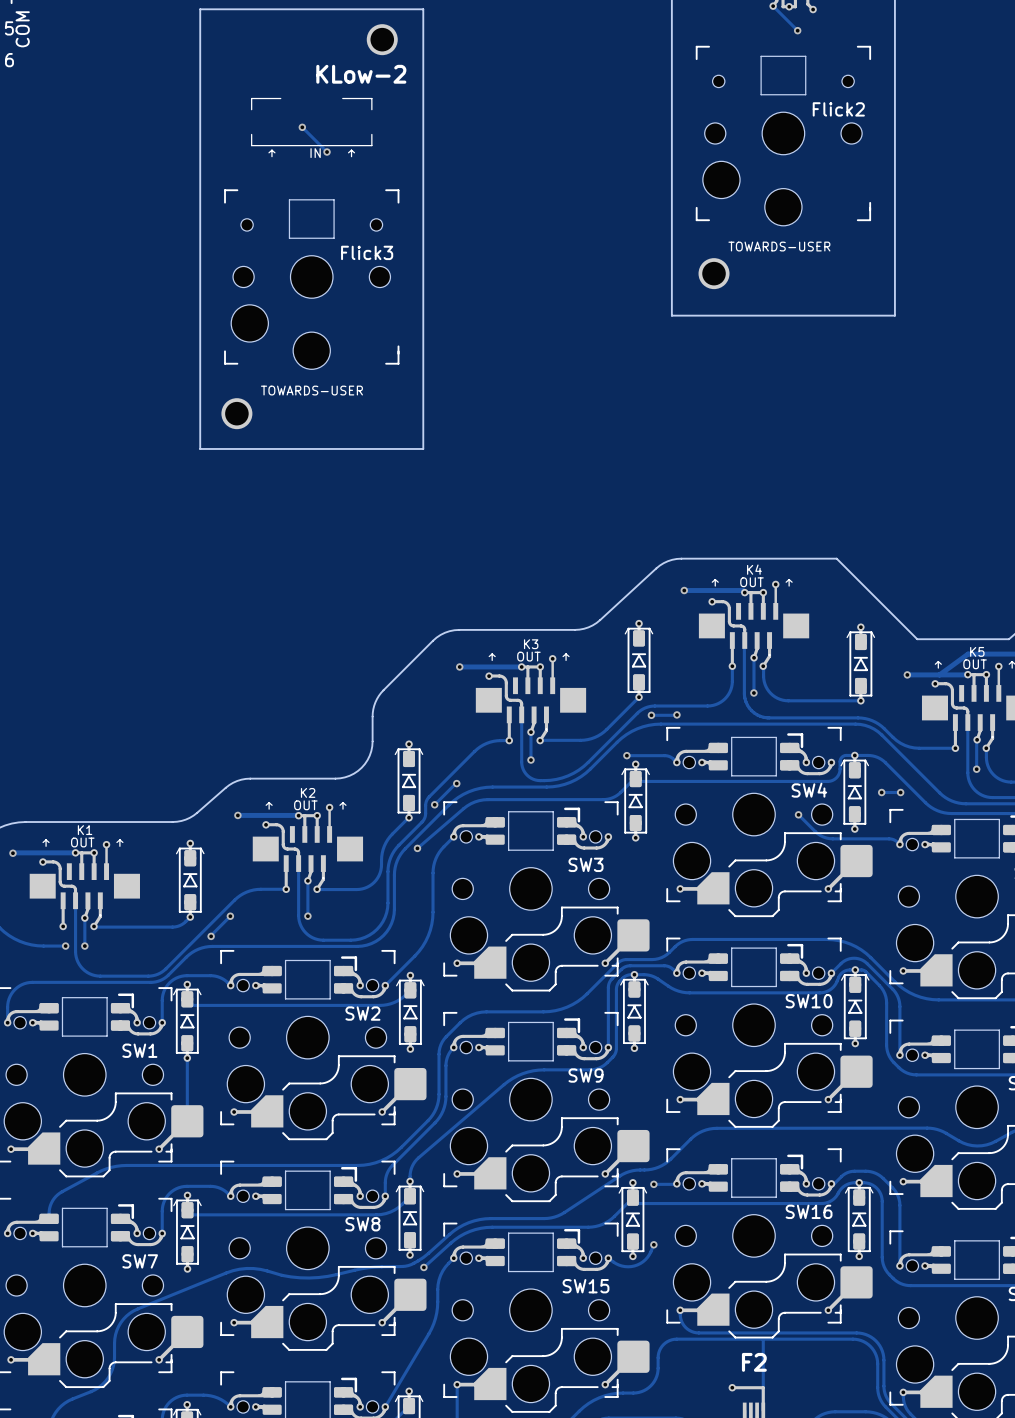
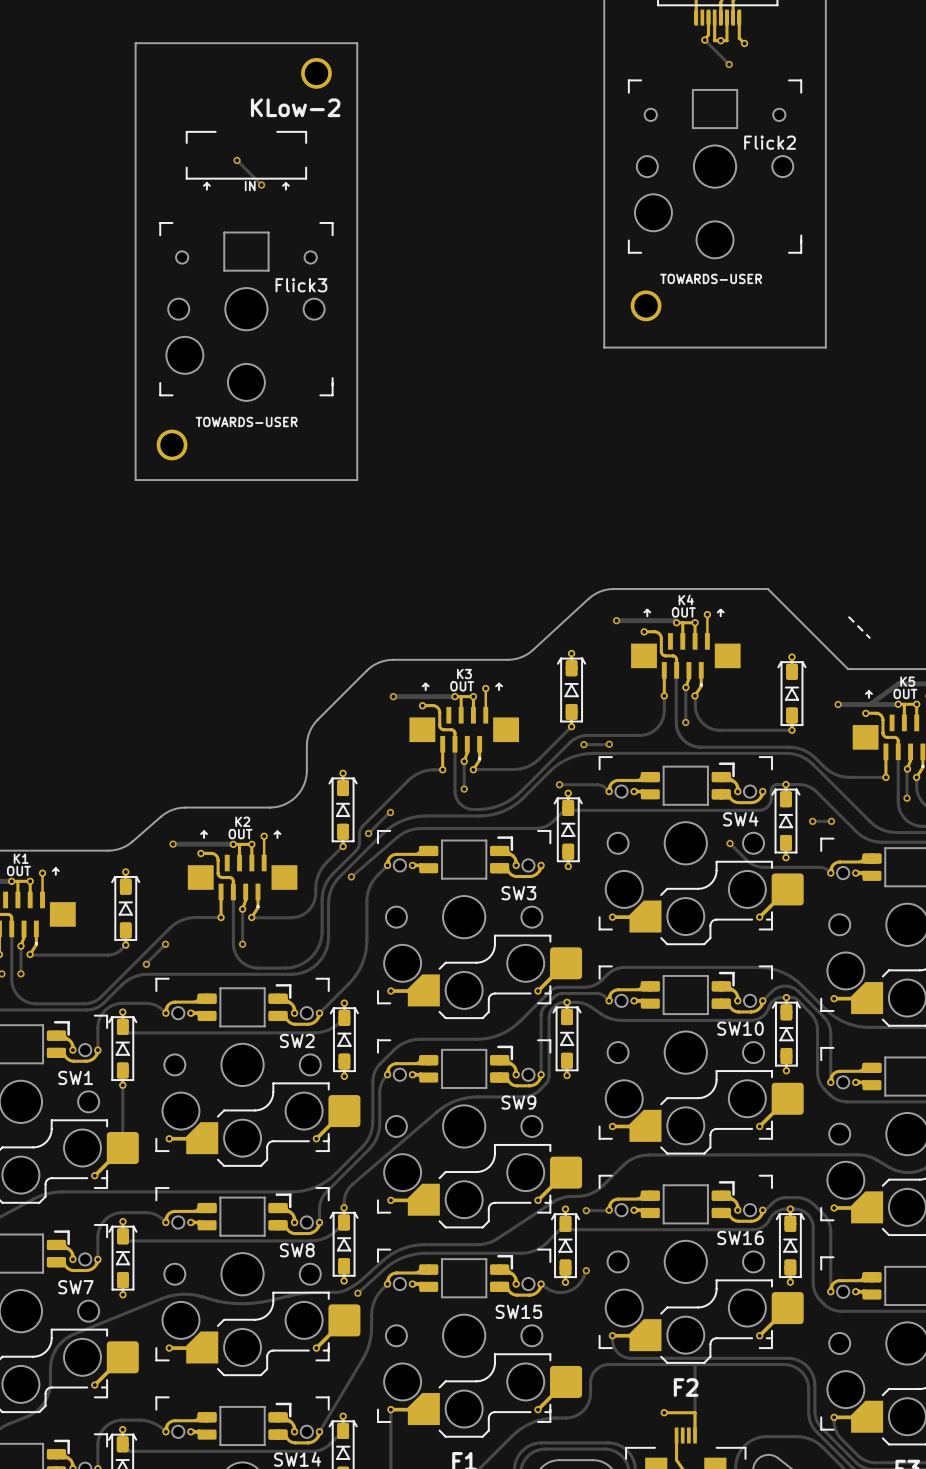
line: none -> (848, 616) (870, 638)

